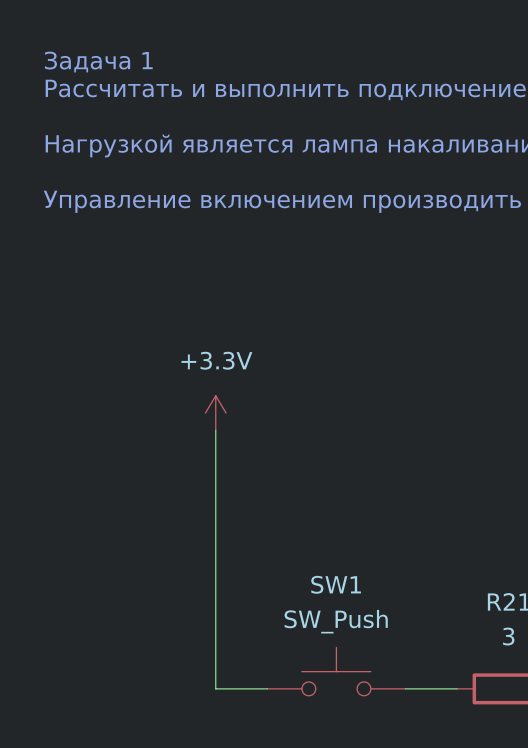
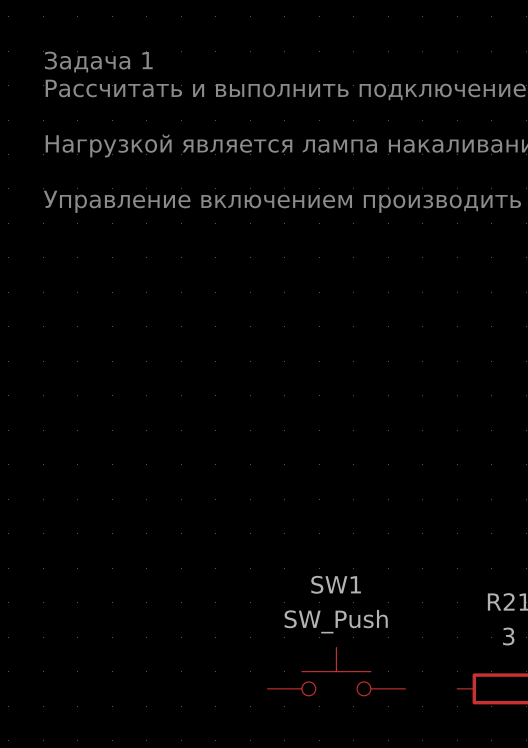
power symbol: +3.3V (215, 413) -> none
wire: (215, 430) (215, 688) (267, 688) -> none
wire: (405, 688) (457, 688) -> none

